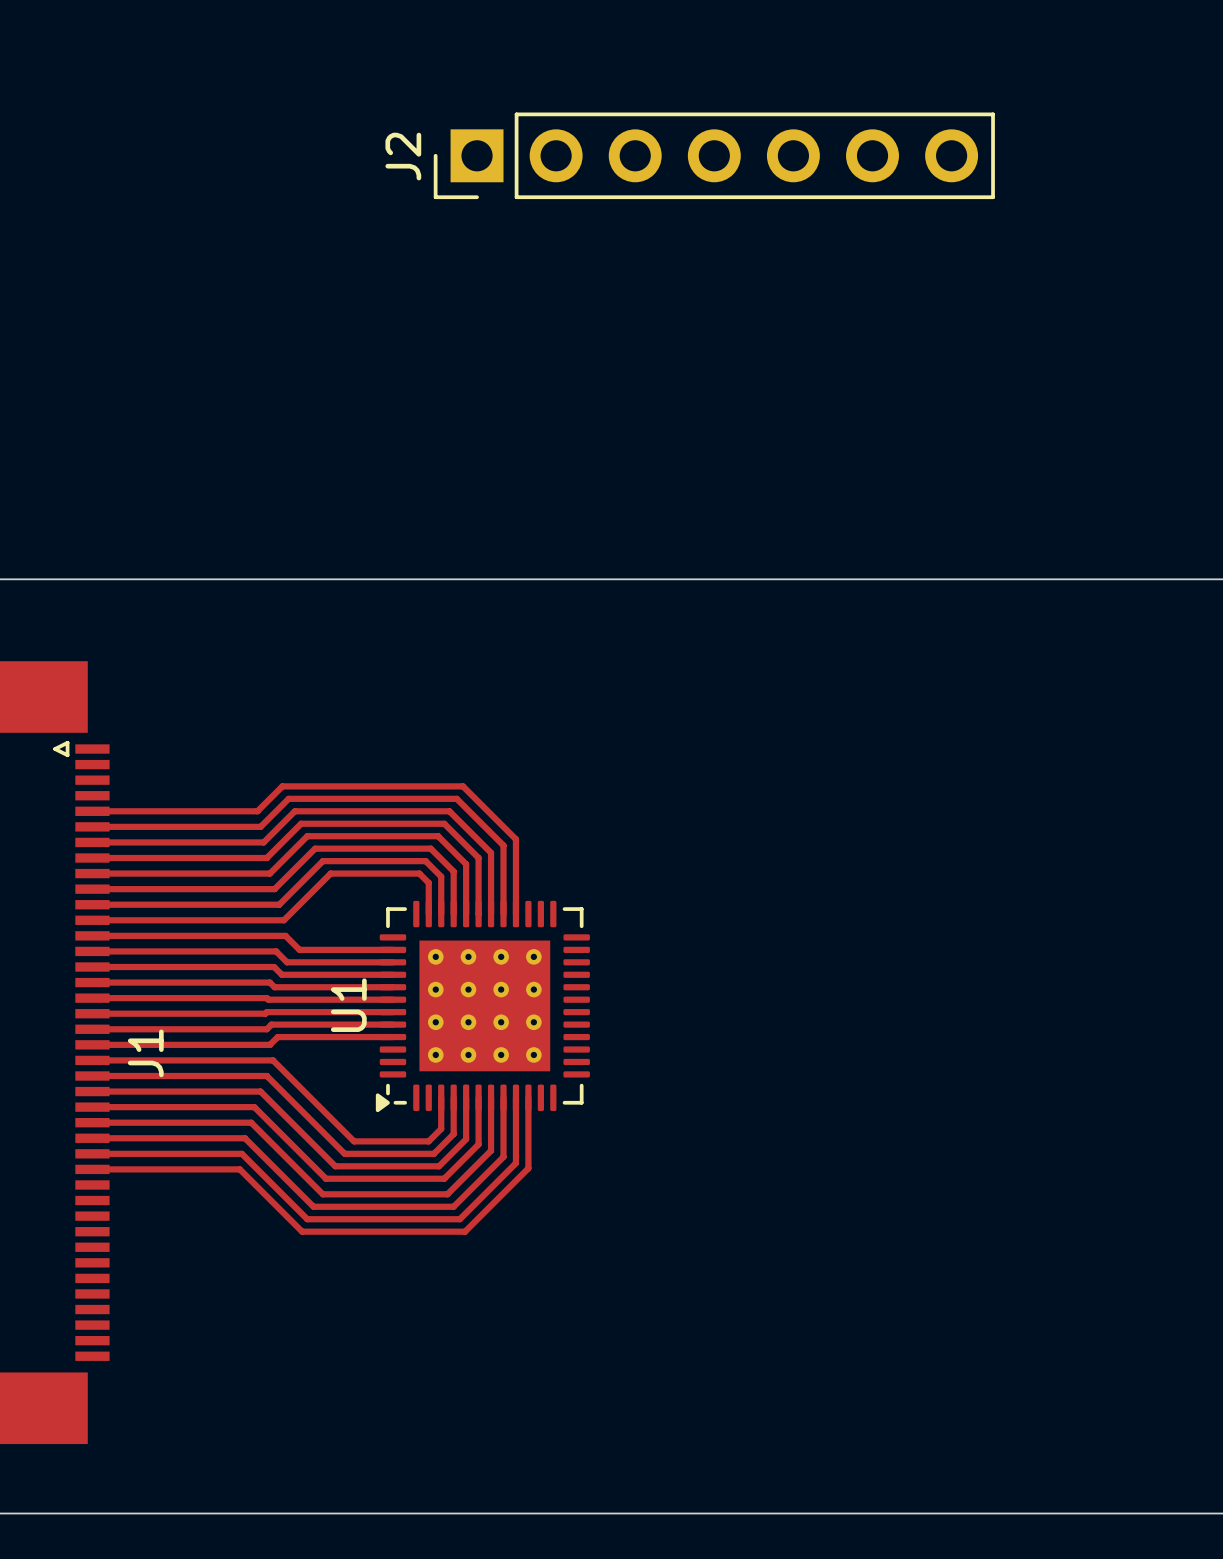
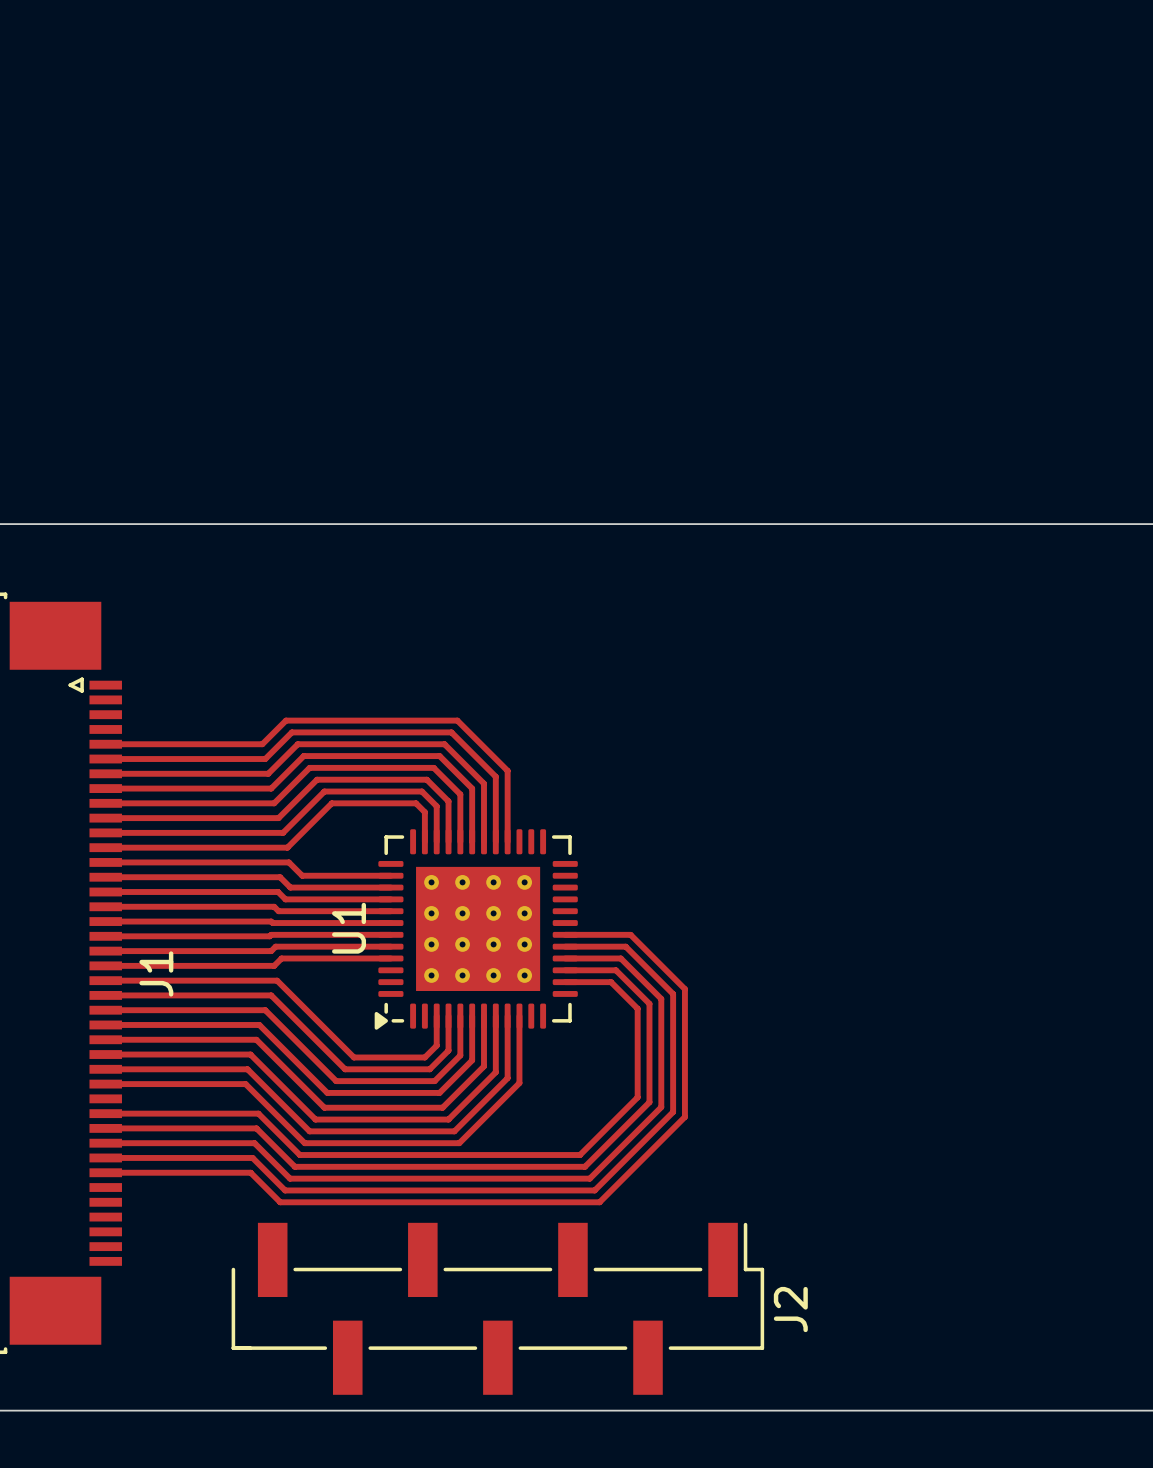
J2 footprint: [433, 112, 995, 200] -> [231, 1222, 765, 1395]
J2 name position: J2 (403, 156) -> J2 (790, 1309)
top track: none -> (565, 934) (630, 934) (684, 989) (684, 1116) (599, 1202) (280, 1202) (250, 1172) (105, 1172)
top track: none -> (565, 946) (625, 946) (673, 994) (673, 1112) (594, 1190) (285, 1190) (252, 1157) (105, 1157)
top track: none -> (565, 958) (620, 958) (661, 998) (661, 1107) (589, 1178) (290, 1178) (254, 1143) (105, 1143)
top track: none -> (565, 970) (615, 970) (649, 1003) (649, 1102) (584, 1166) (294, 1166) (256, 1128) (105, 1128)
top track: none -> (565, 982) (611, 982) (637, 1008) (637, 1097) (580, 1155) (299, 1155) (258, 1113) (105, 1113)

